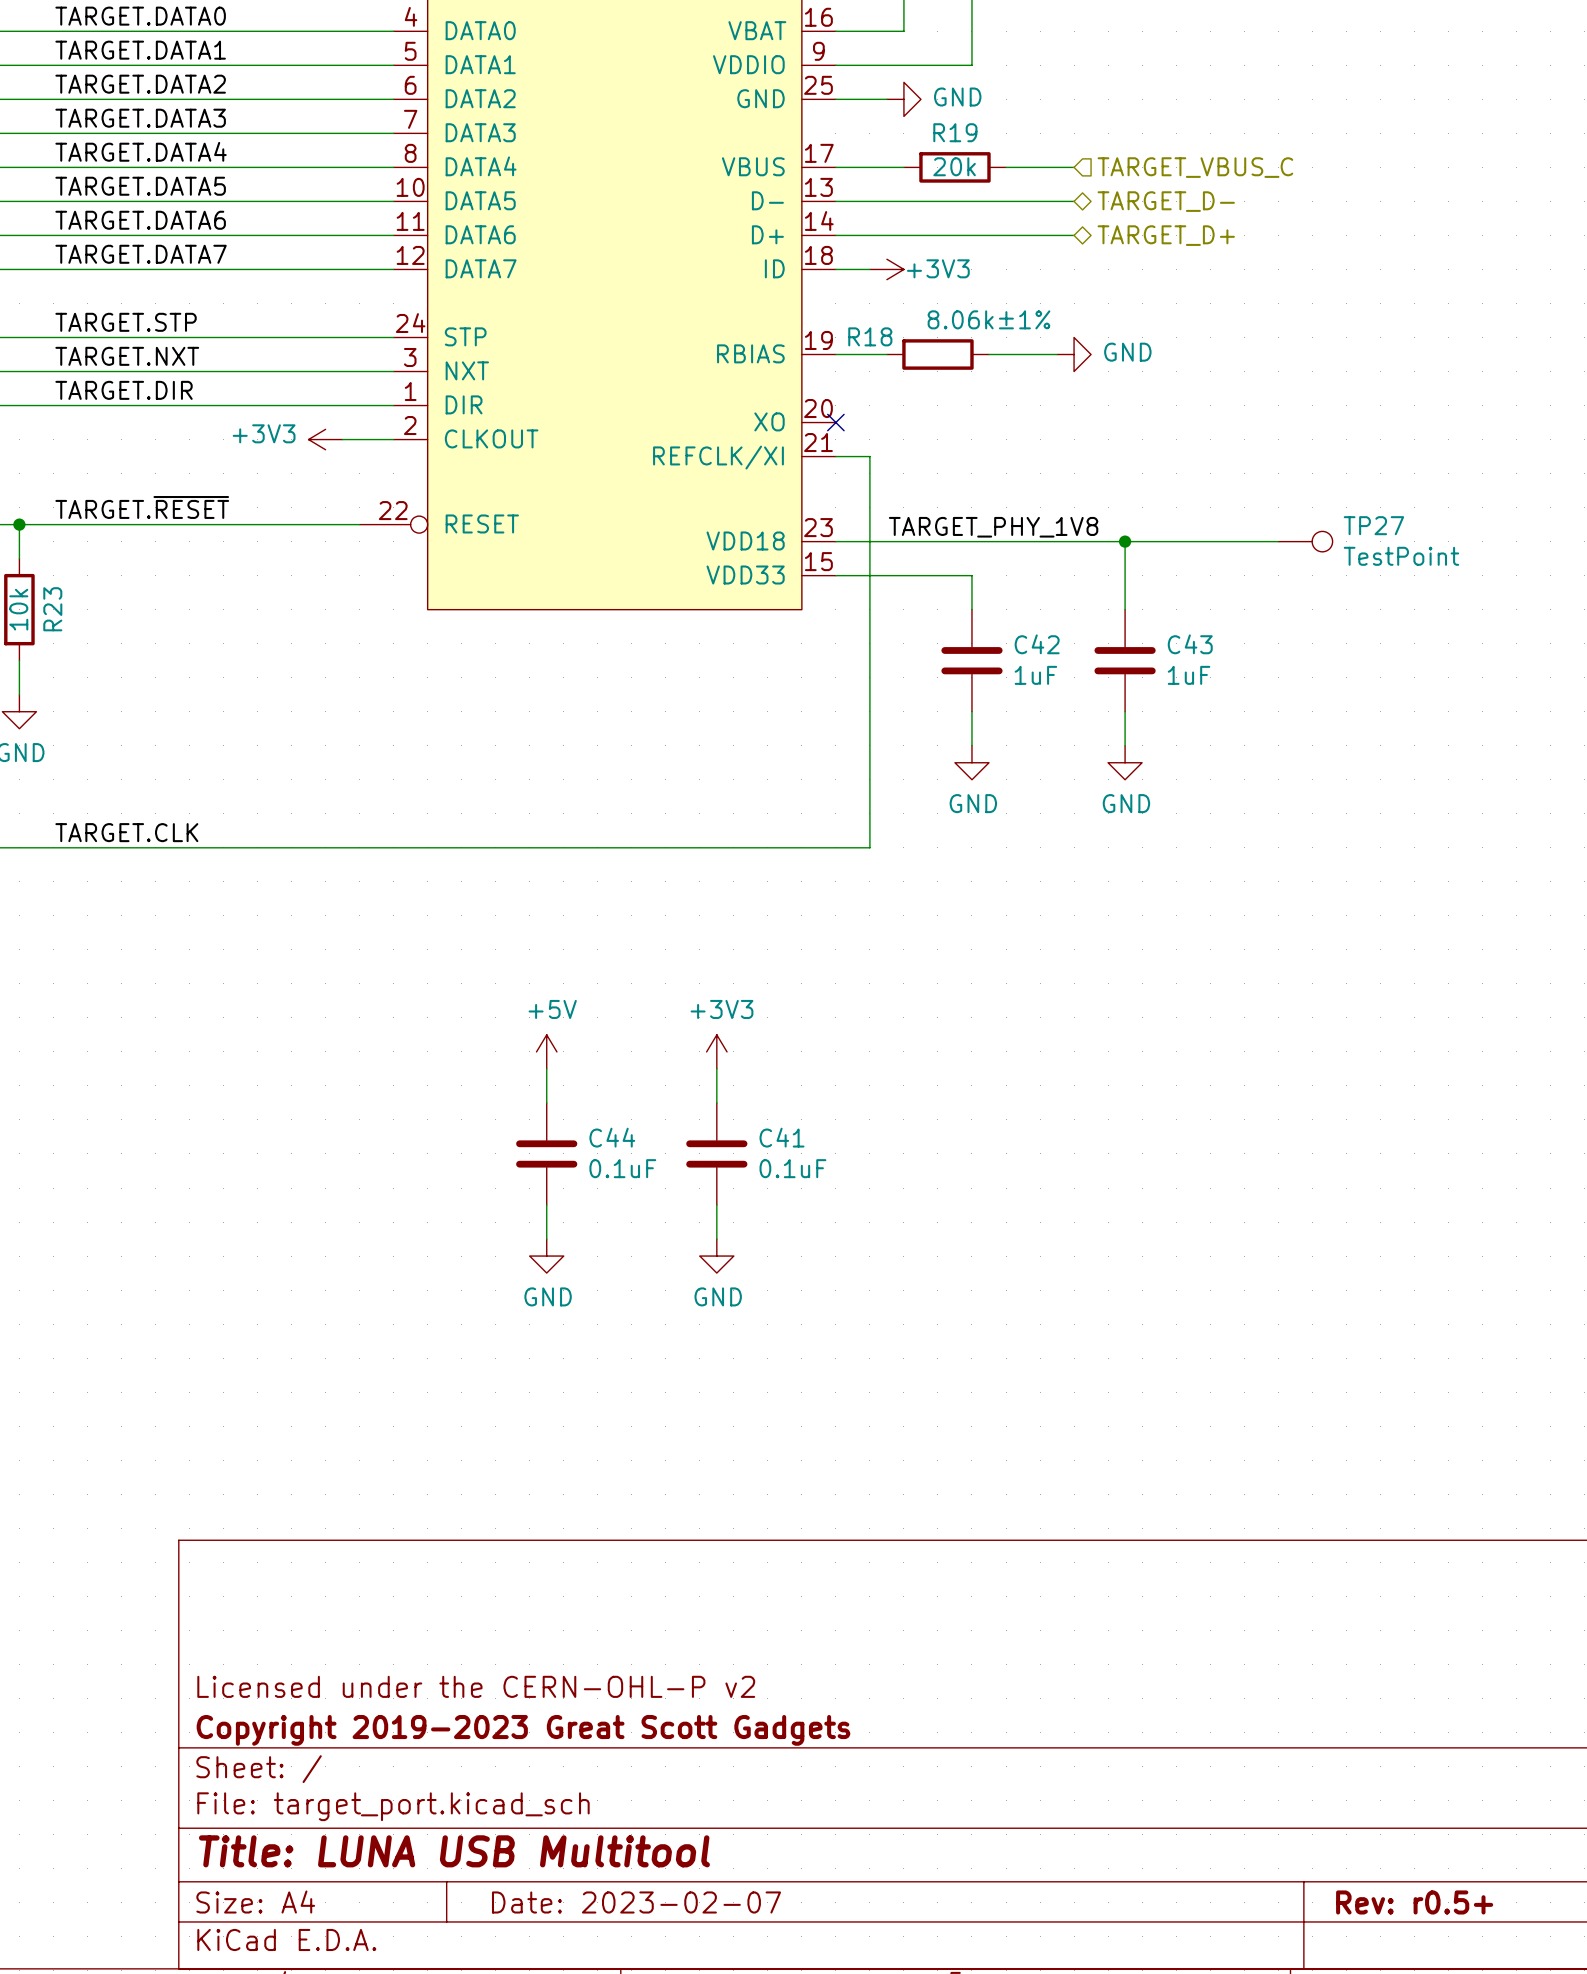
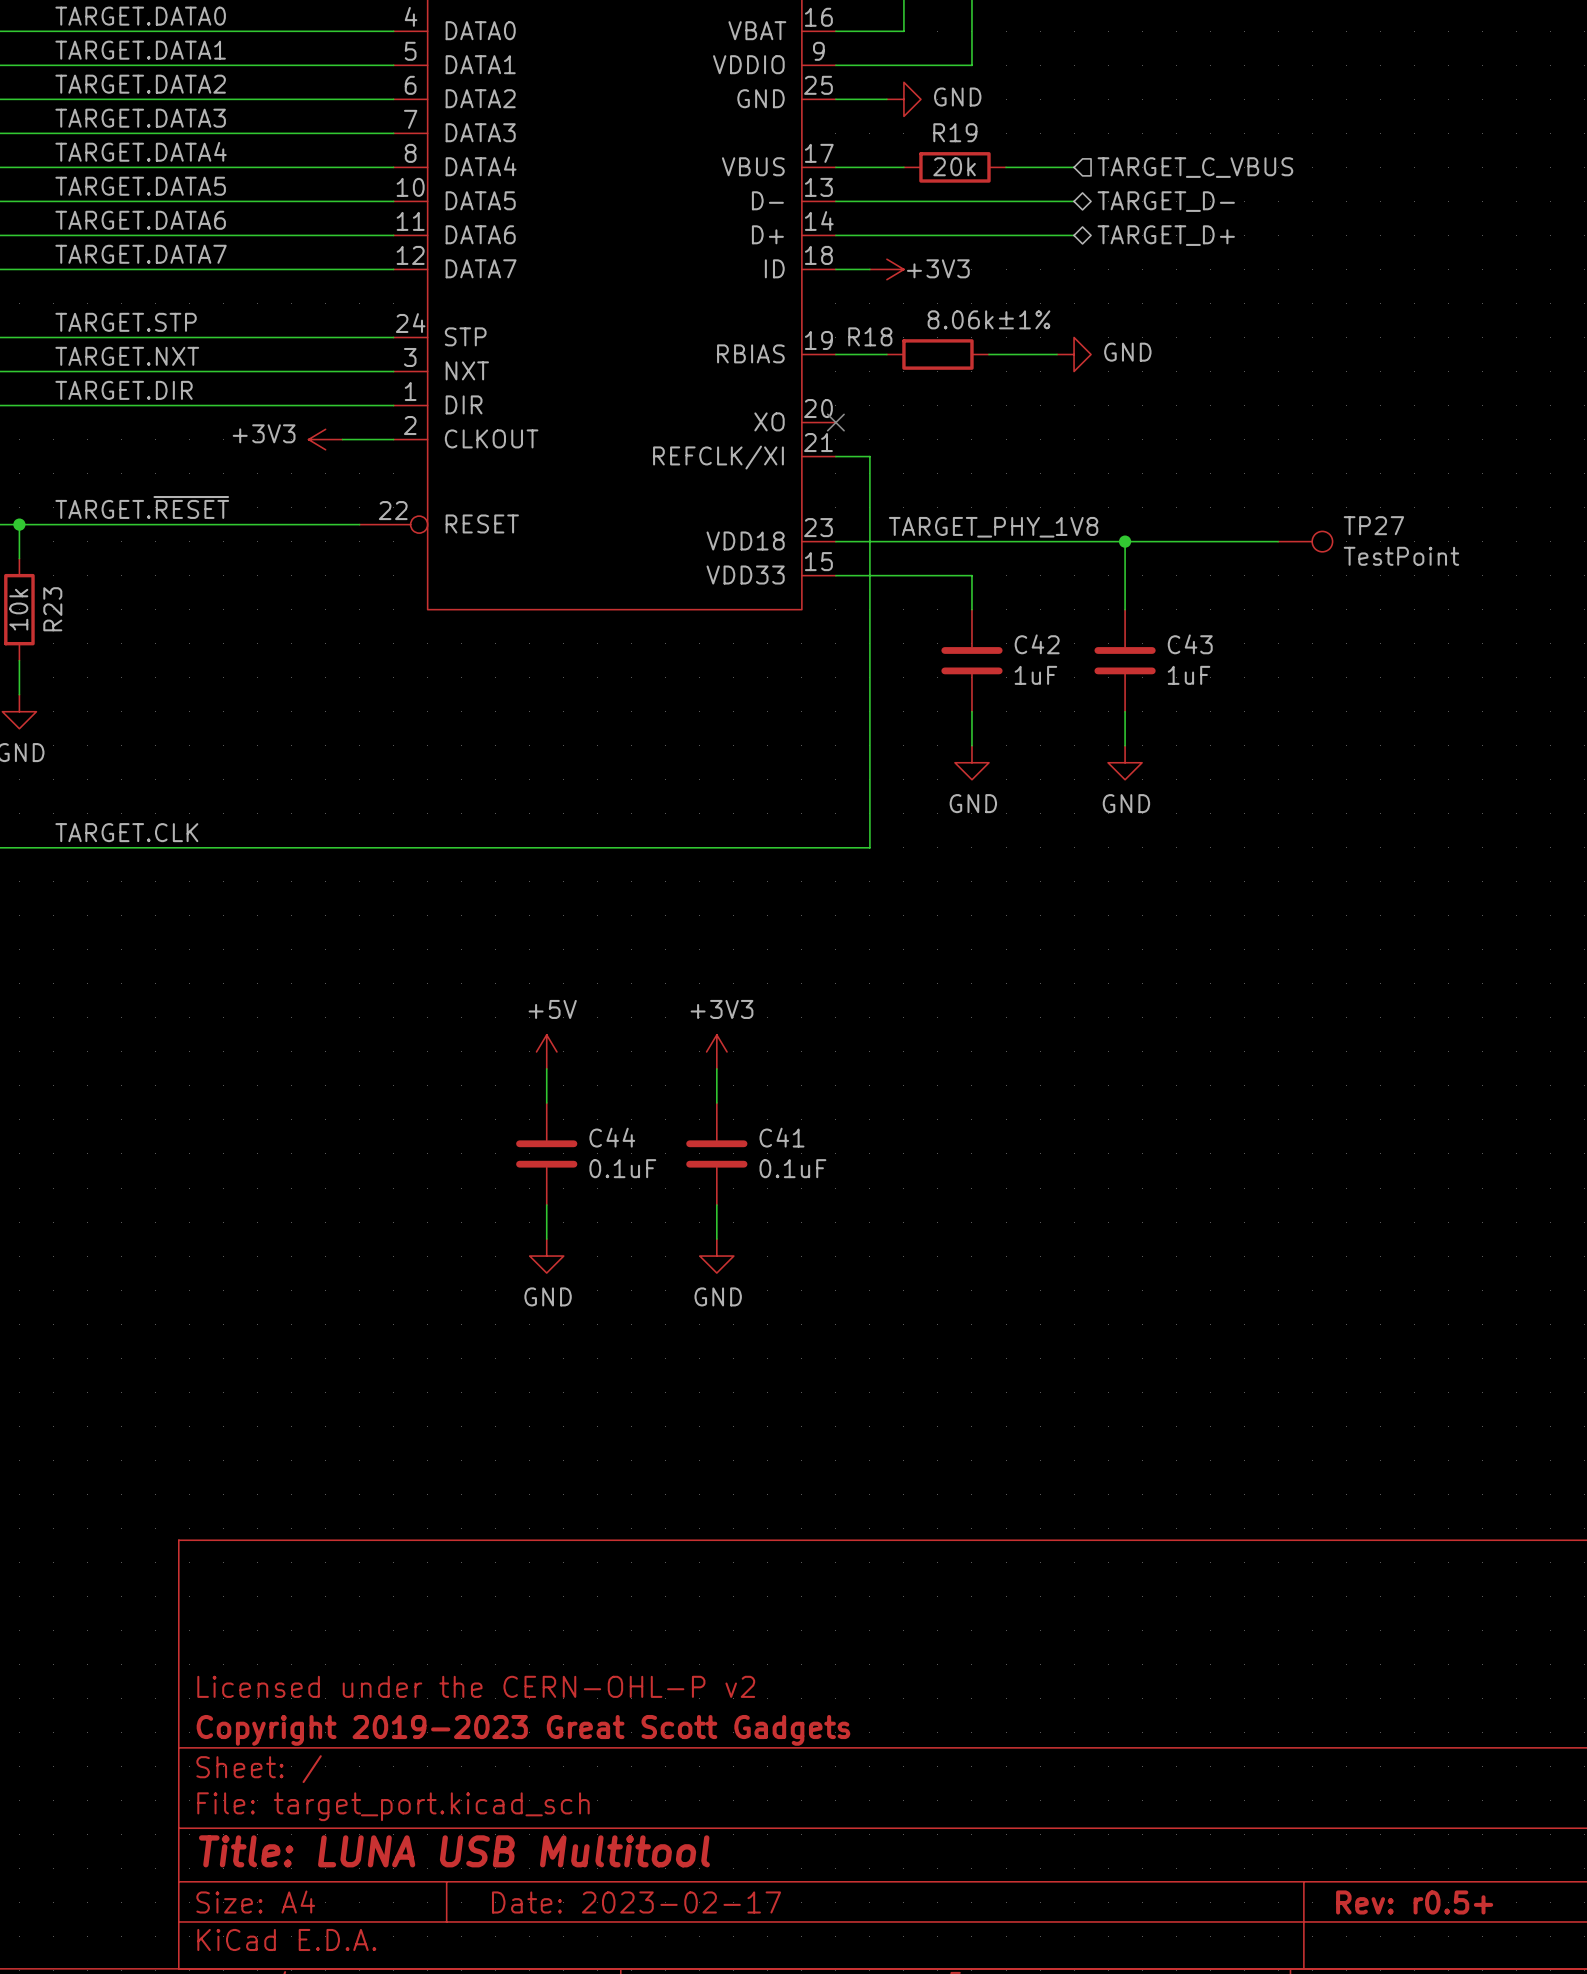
hierarchical label: TARGET_VBUS_C (1195, 167) -> TARGET_C_VBUS (1195, 167)
title block: Date: 2023-02-07 (636, 1902) -> Date: 2023-02-17 (636, 1902)

